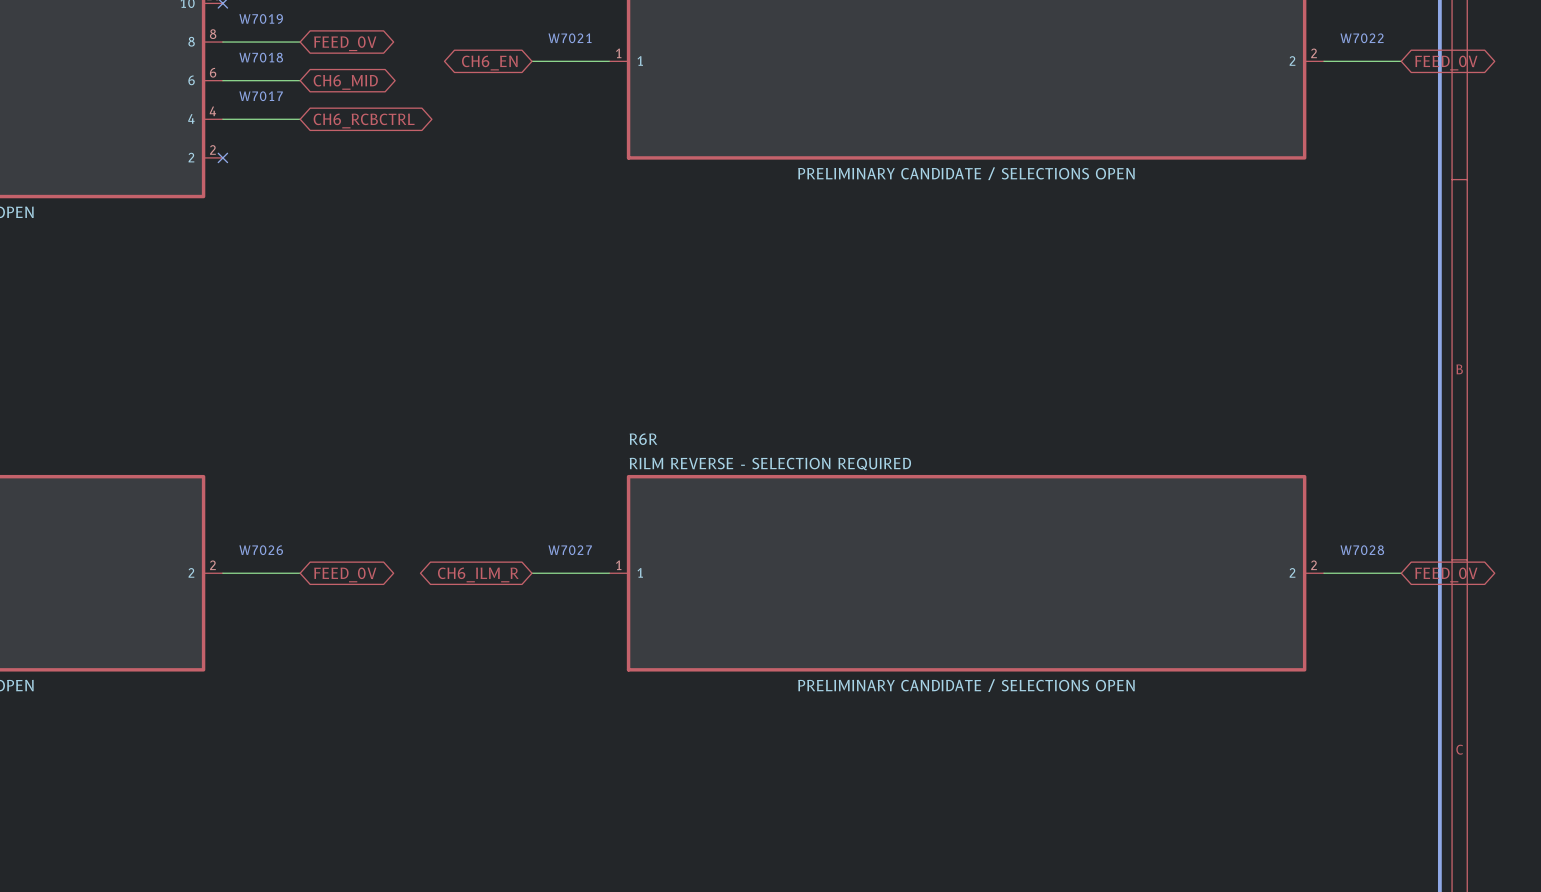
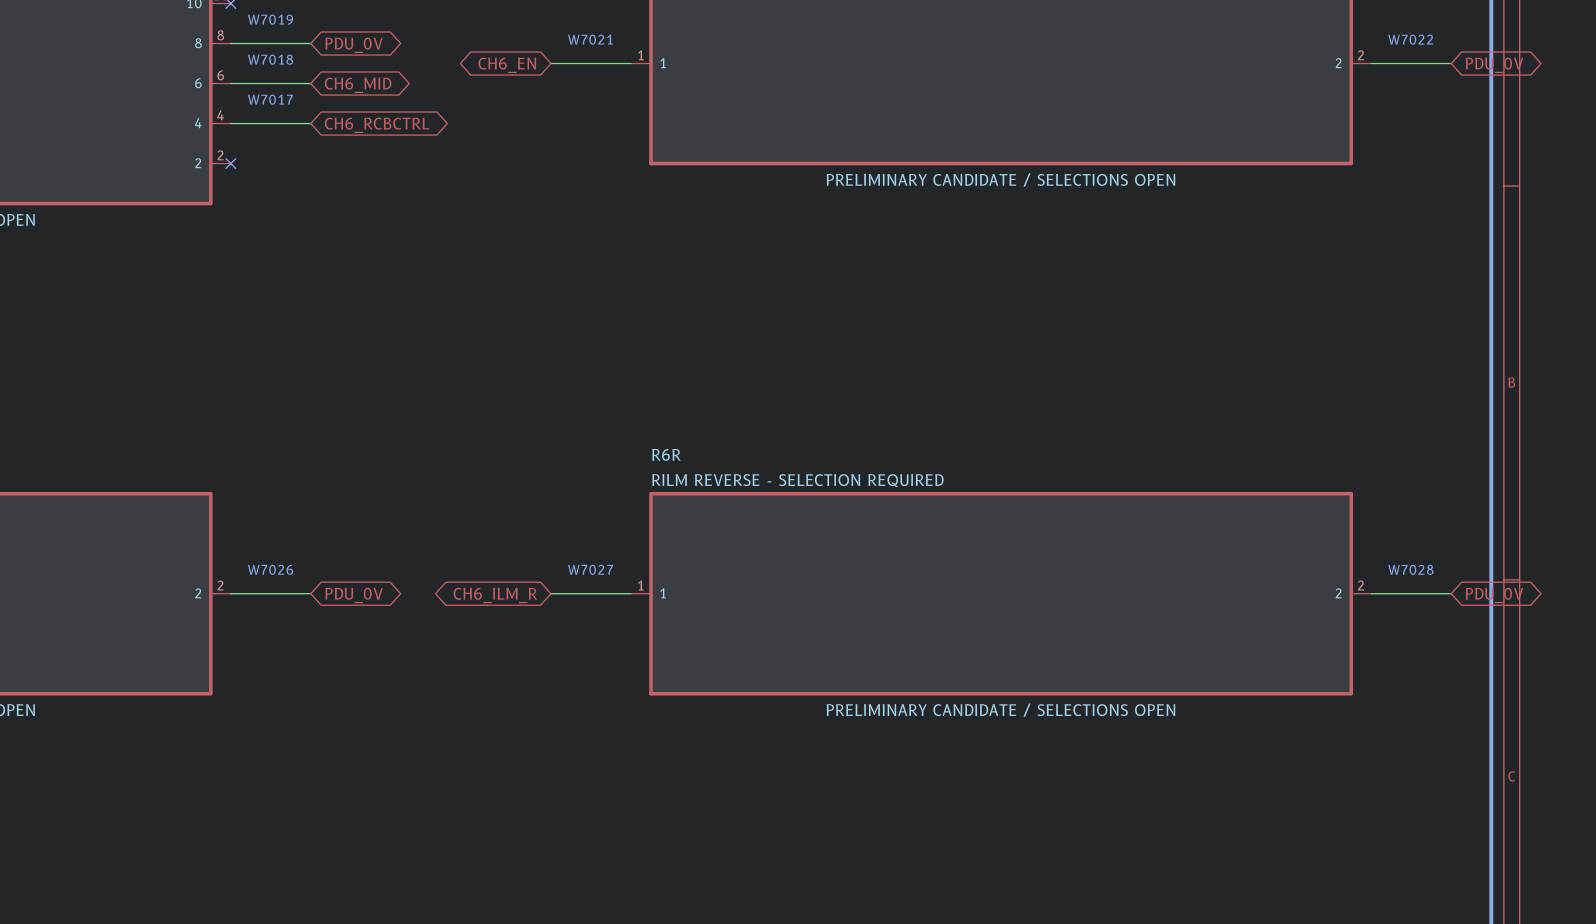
global label: FEED_0V (345, 43) -> PDU_0V (354, 45)
global label: FEED_0V (1446, 63) -> PDU_0V (1494, 65)
global label: FEED_0V (345, 574) -> PDU_0V (354, 595)
global label: FEED_0V (1446, 574) -> PDU_0V (1494, 595)

